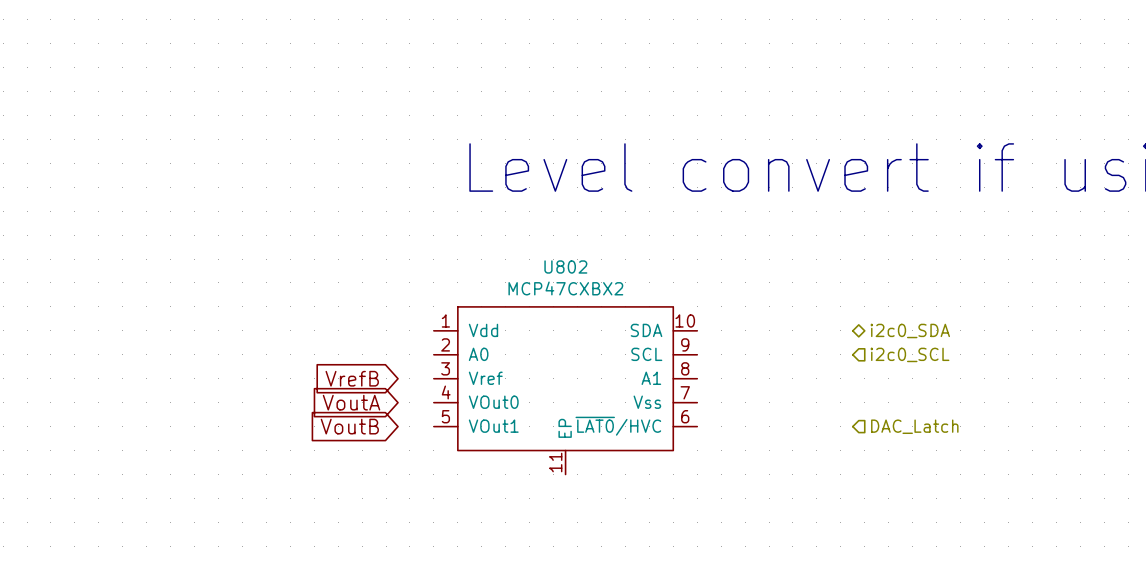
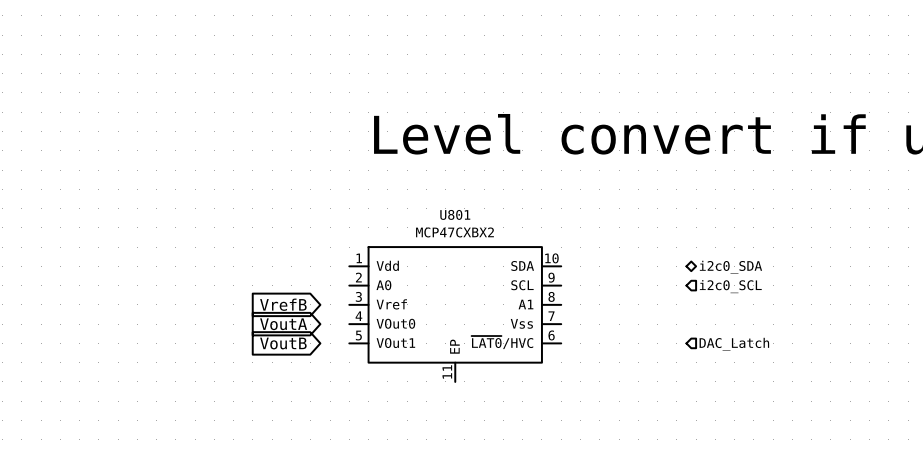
U802 name: U802 (565, 266) -> U801 (455, 214)

